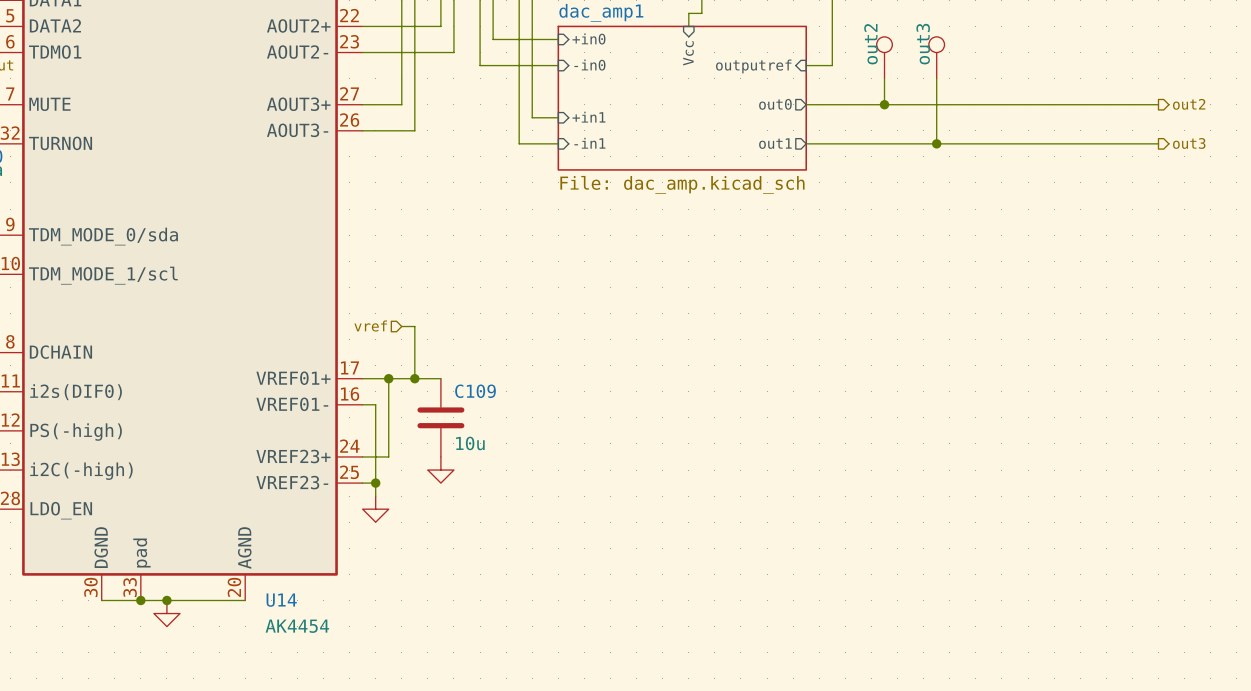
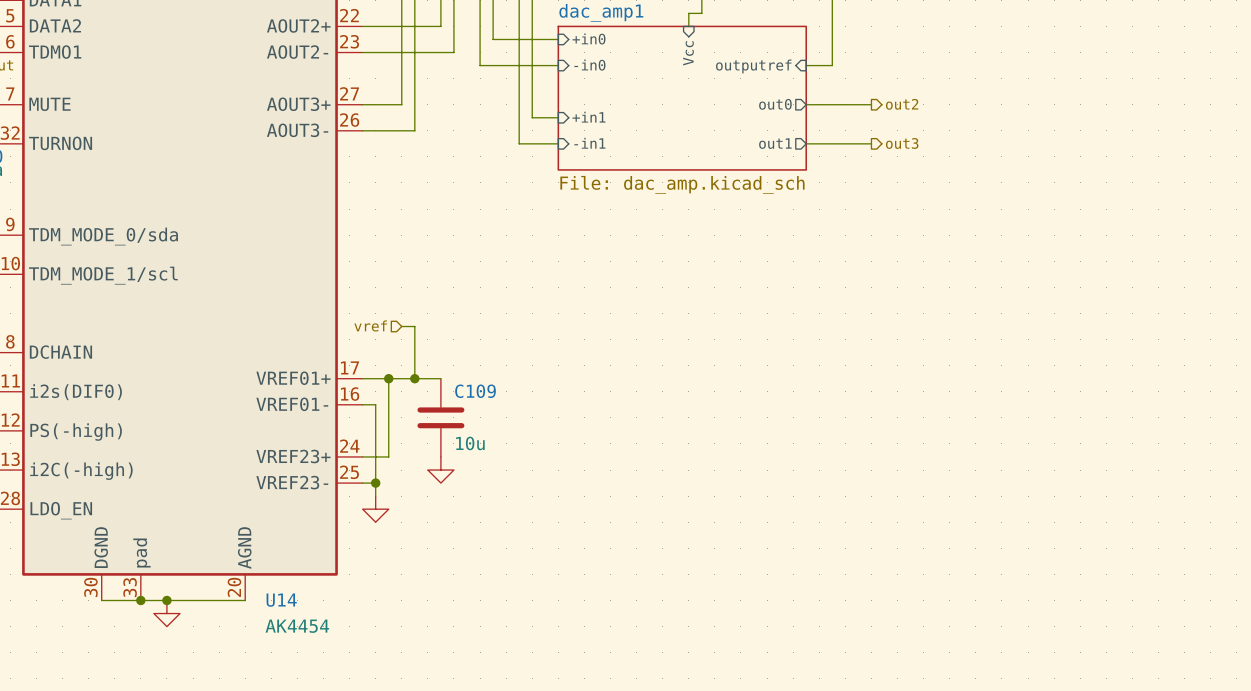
part: out2 (884, 57) -> none
part: out3 (936, 57) -> none
wire: (884, 78) (884, 104) -> none
wire: (936, 78) (936, 143) -> none
wire: (871, 104) (1158, 104) -> none
junction: (884, 104) -> none
hierarchical label: none -> out2 (902, 104)
hierarchical label: out2 (1189, 104) -> none
wire: (871, 143) (1158, 143) -> none
hierarchical label: none -> out3 (902, 143)
junction: (936, 143) -> none
hierarchical label: out3 (1189, 143) -> none

